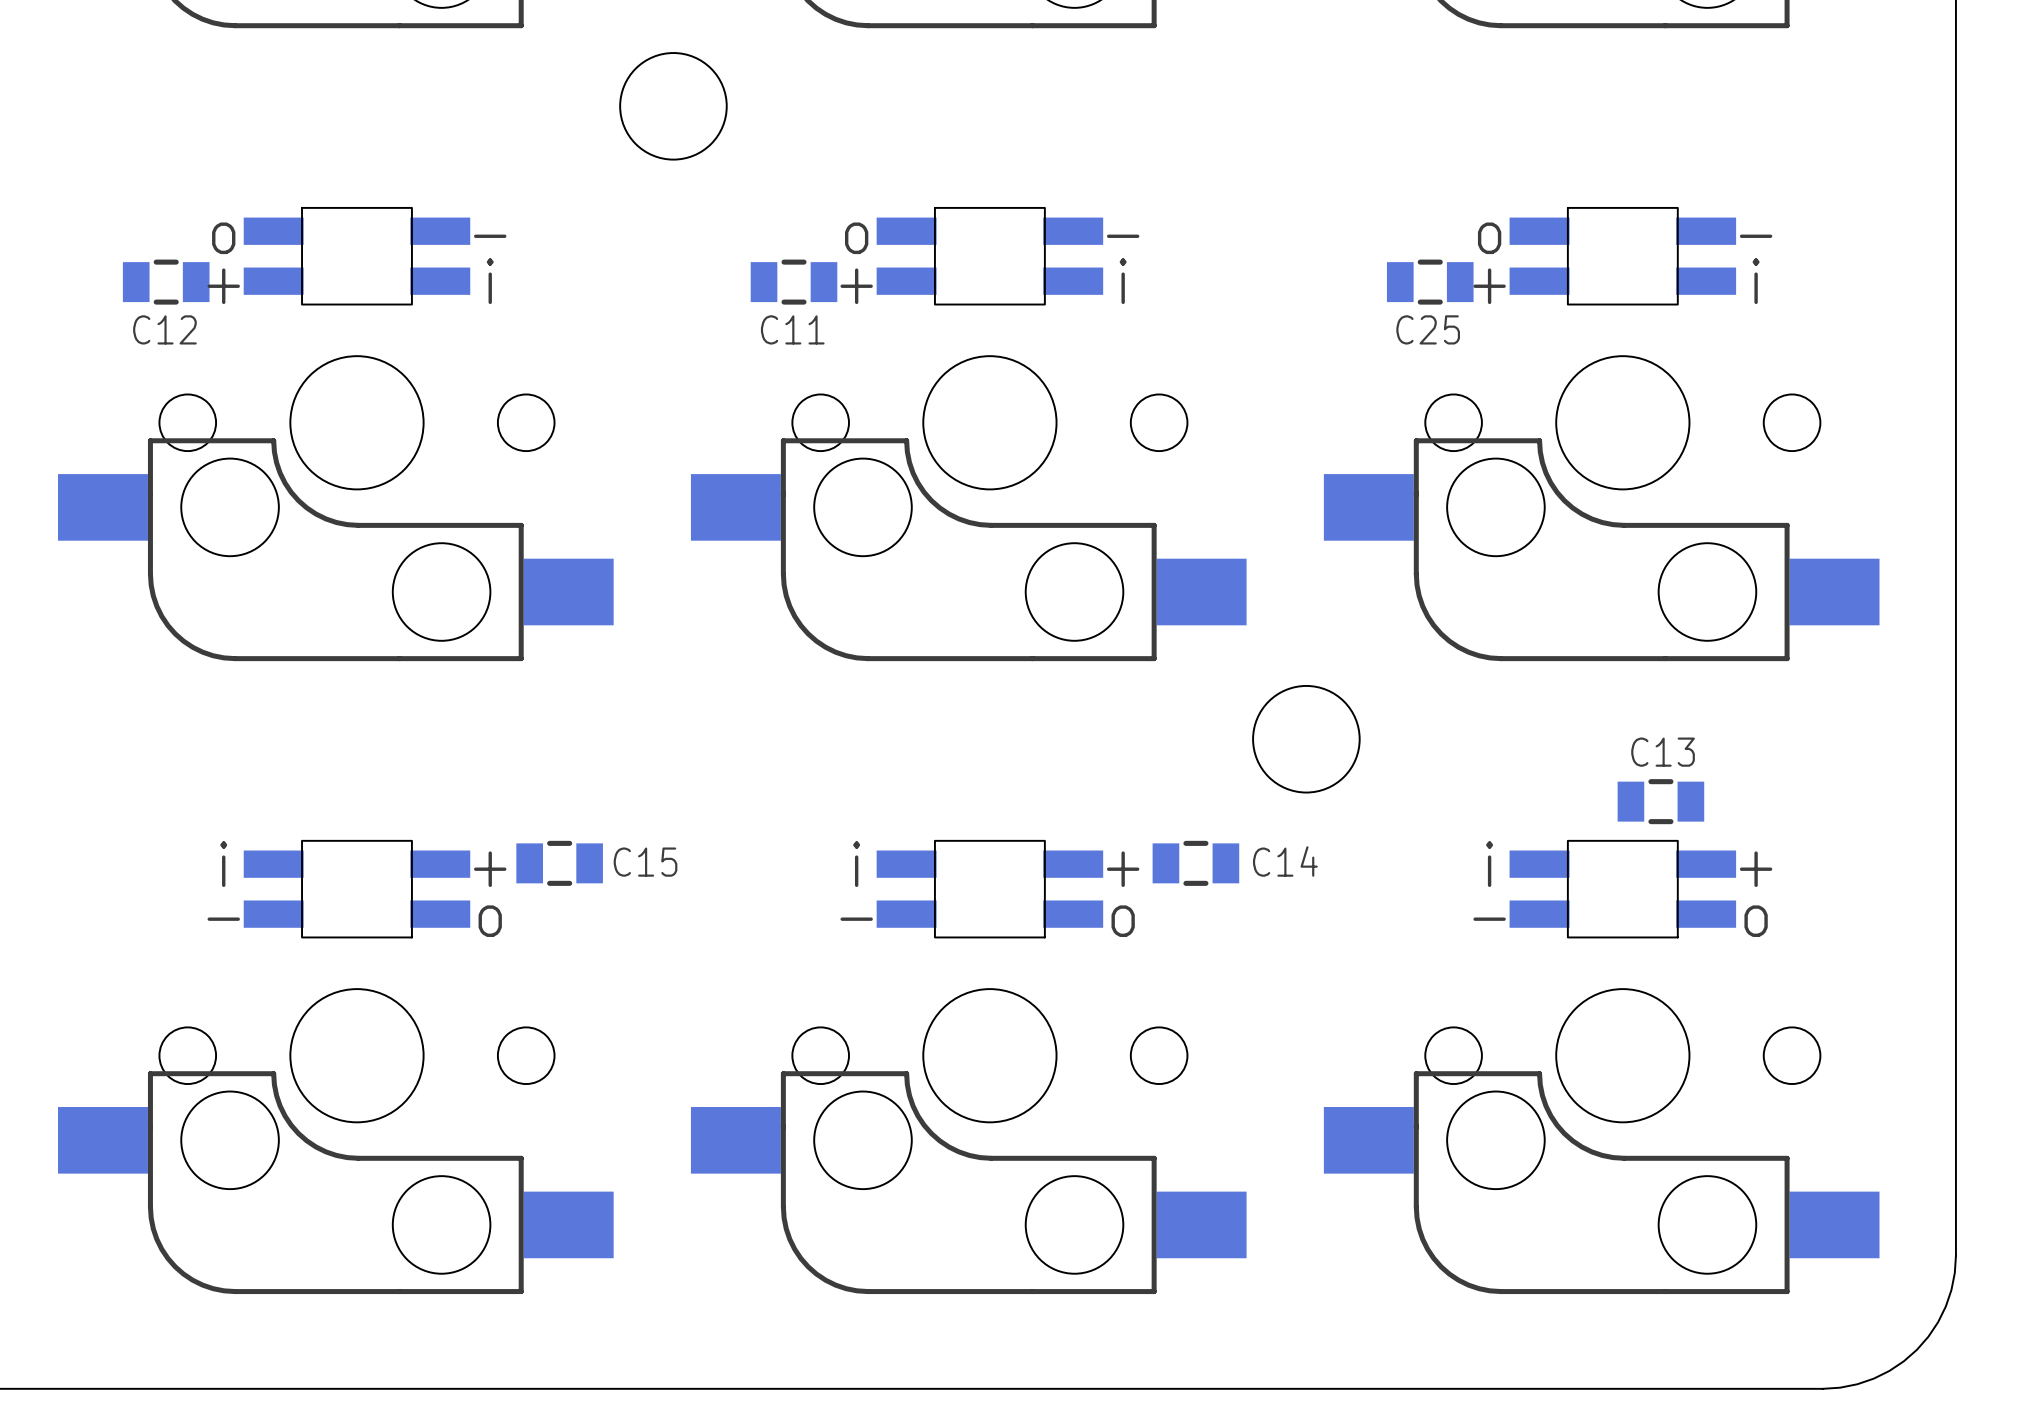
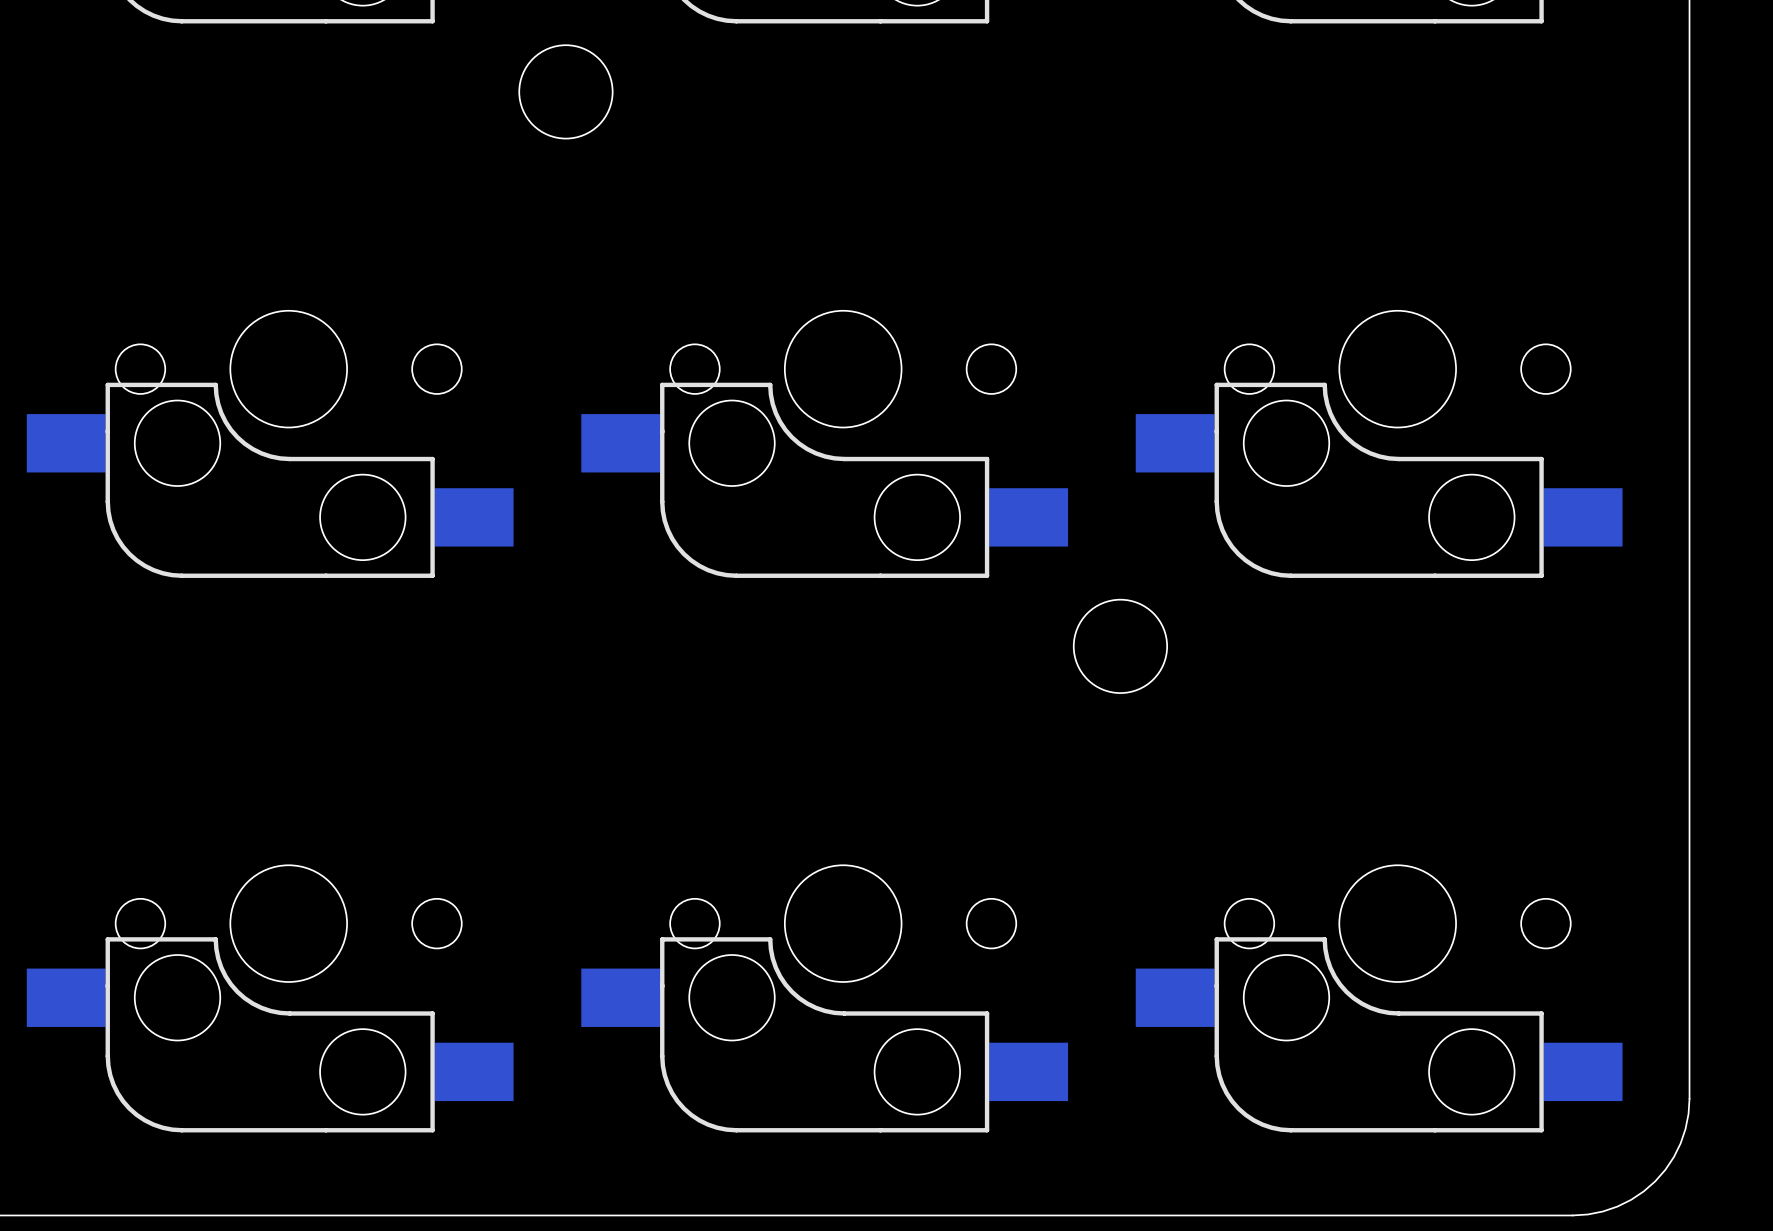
part: (356, 256) -> none
part: (989, 256) -> none
part: (1622, 256) -> none
C12: (166, 282) -> none
C11: (794, 282) -> none
C25: (1430, 282) -> none
C13: (1660, 801) -> none
C15: (559, 863) -> none
C14: (1195, 863) -> none
part: (356, 889) -> none
part: (989, 889) -> none
part: (1622, 889) -> none

